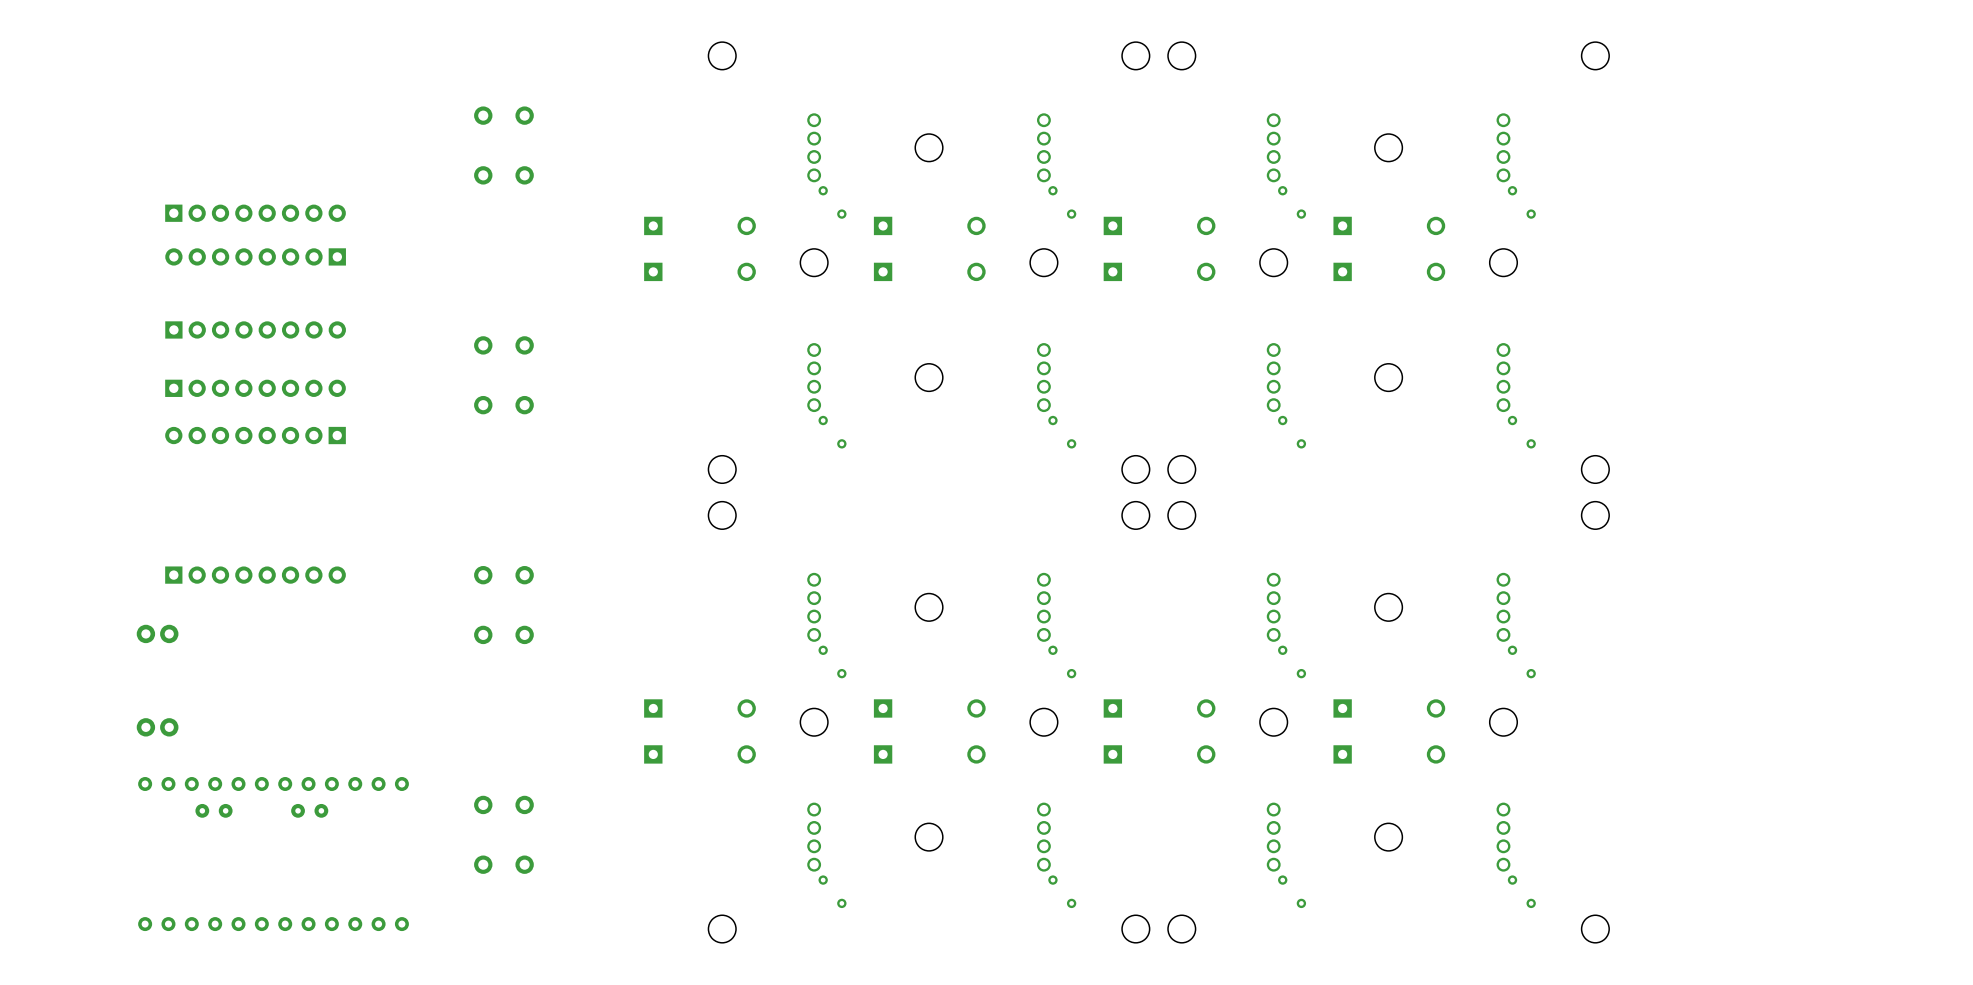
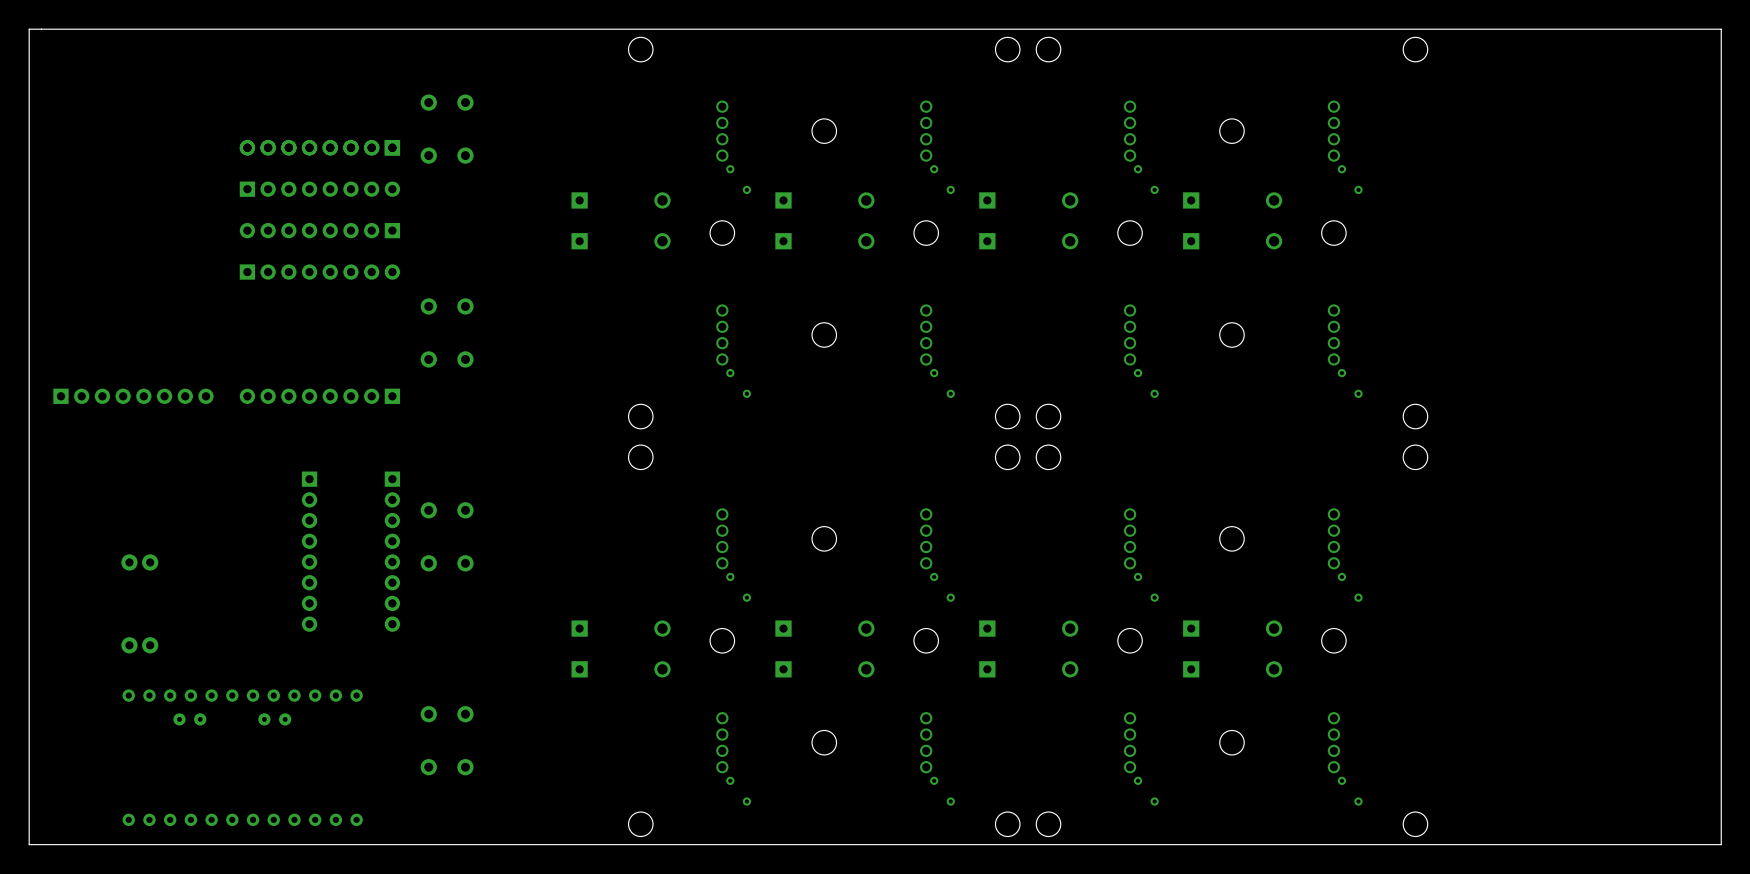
board edge: none -> (1721, 29) (1721, 844) (29, 844) (29, 29) (1721, 29)
part: none -> (319, 147)
part: (255, 213) -> none
part: none -> (319, 189)
part: (255, 256) -> none
part: none -> (319, 230)
part: none -> (319, 272)
part: (255, 329) -> none
part: (255, 388) -> none
part: (255, 435) -> none
part: none -> (133, 396)
part: none -> (319, 396)
part: (255, 575) -> none
part: none -> (309, 551)
part: none -> (392, 551)

